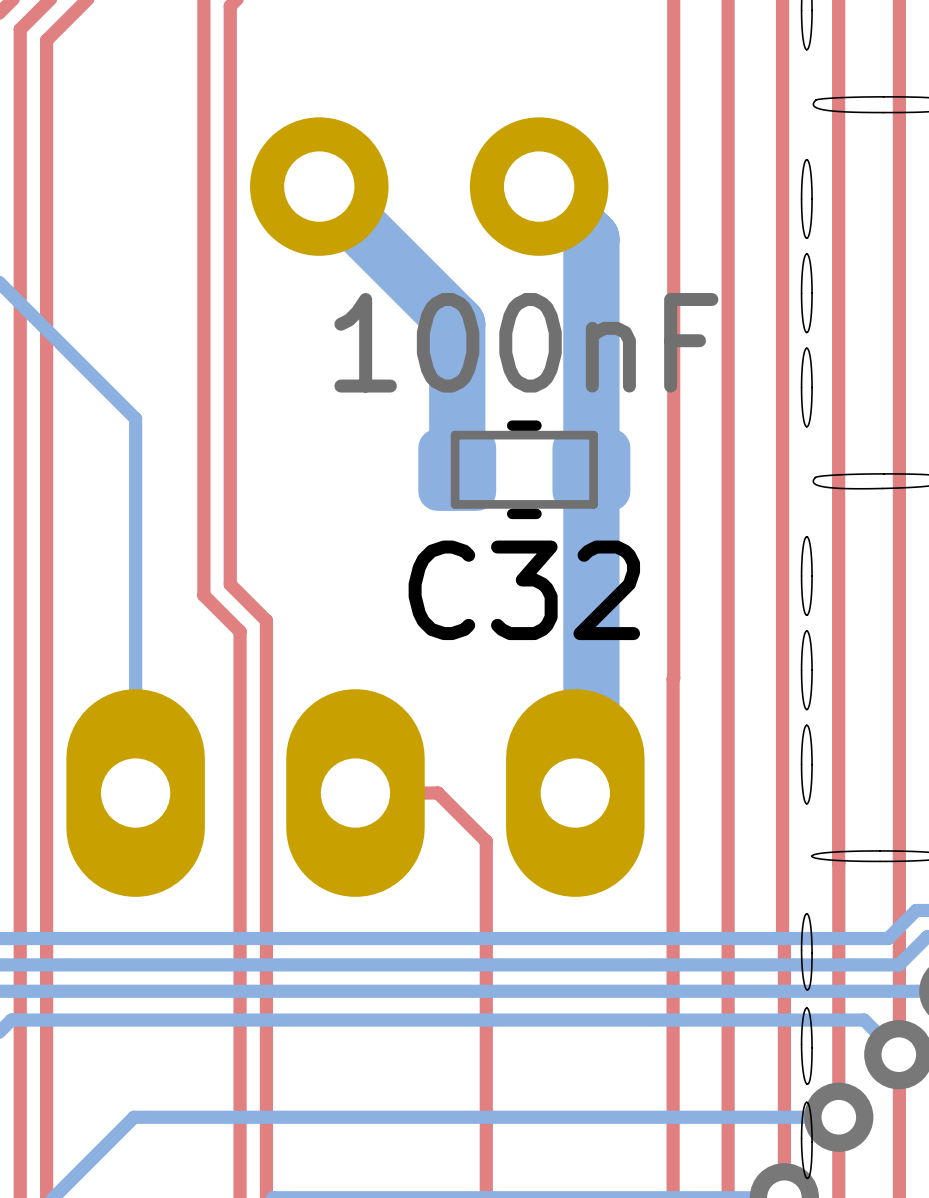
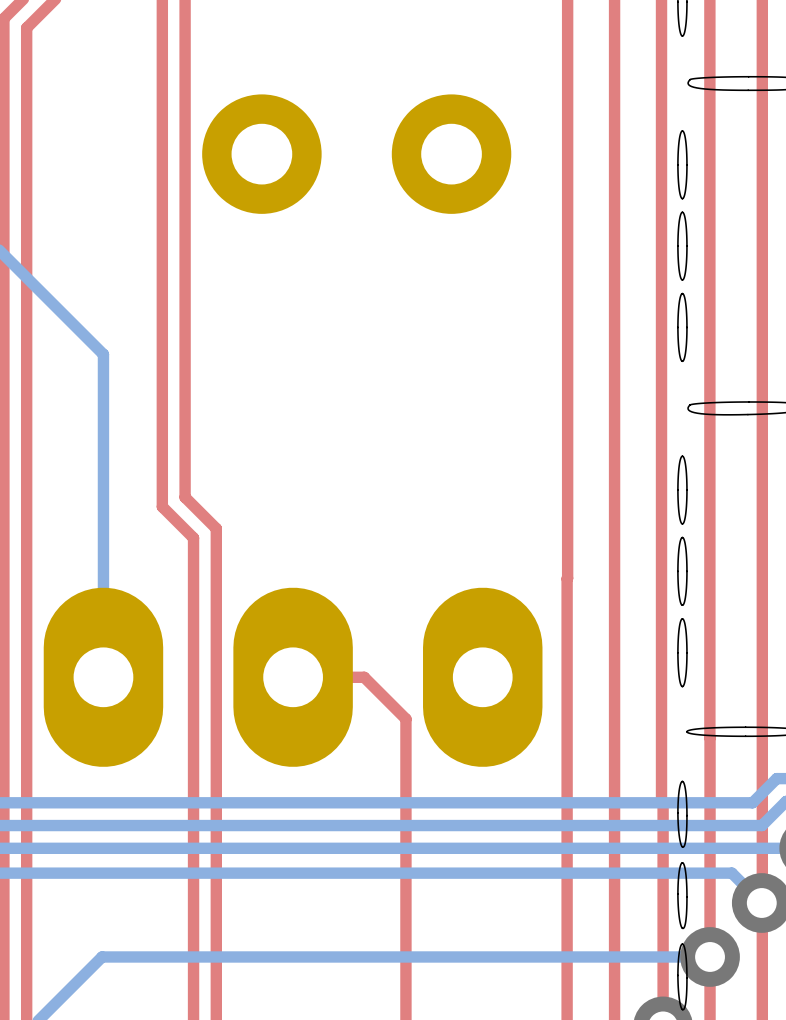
bottom track: (319, 186) (457, 324) (457, 469) -> none
bottom track: (539, 186) (591, 238) (591, 776) -> none
C32: 100nF (524, 469) -> none

